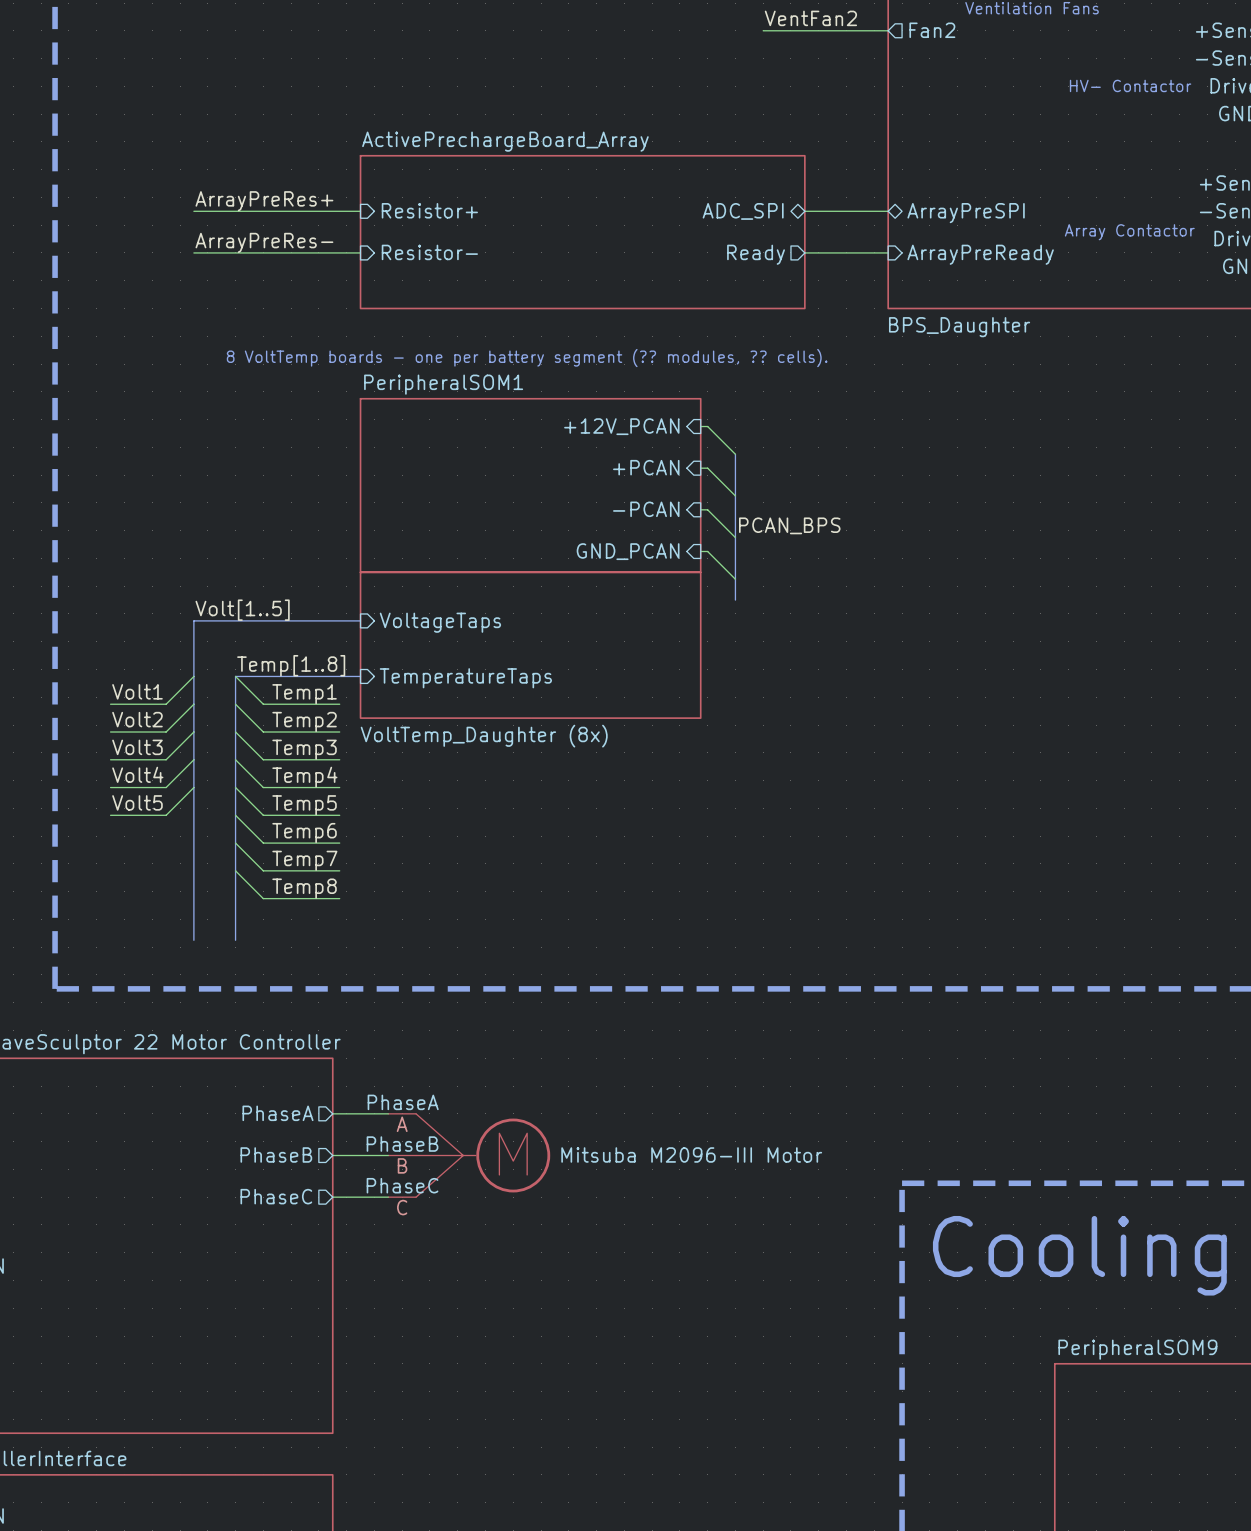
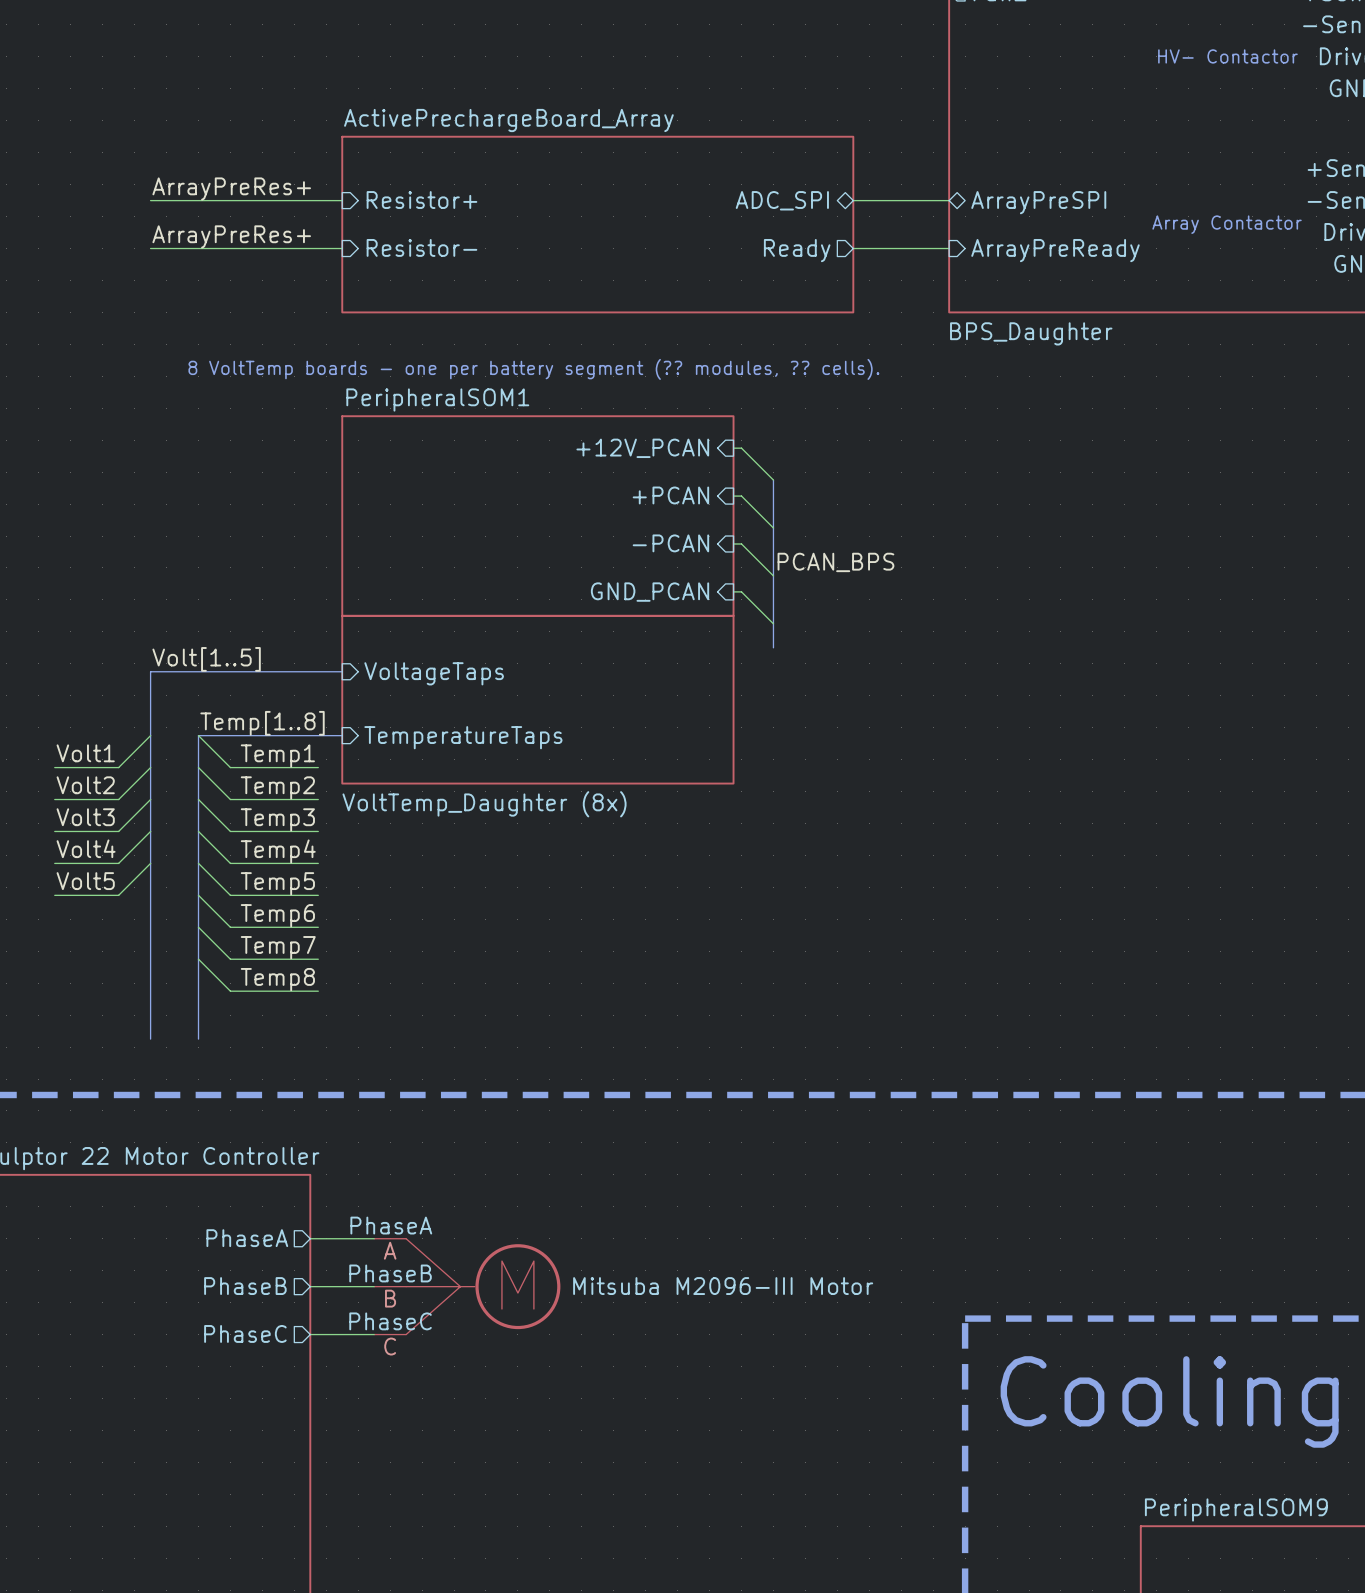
label: ArrayPreRes- (264, 242) -> ArrayPreRes+ (231, 236)

